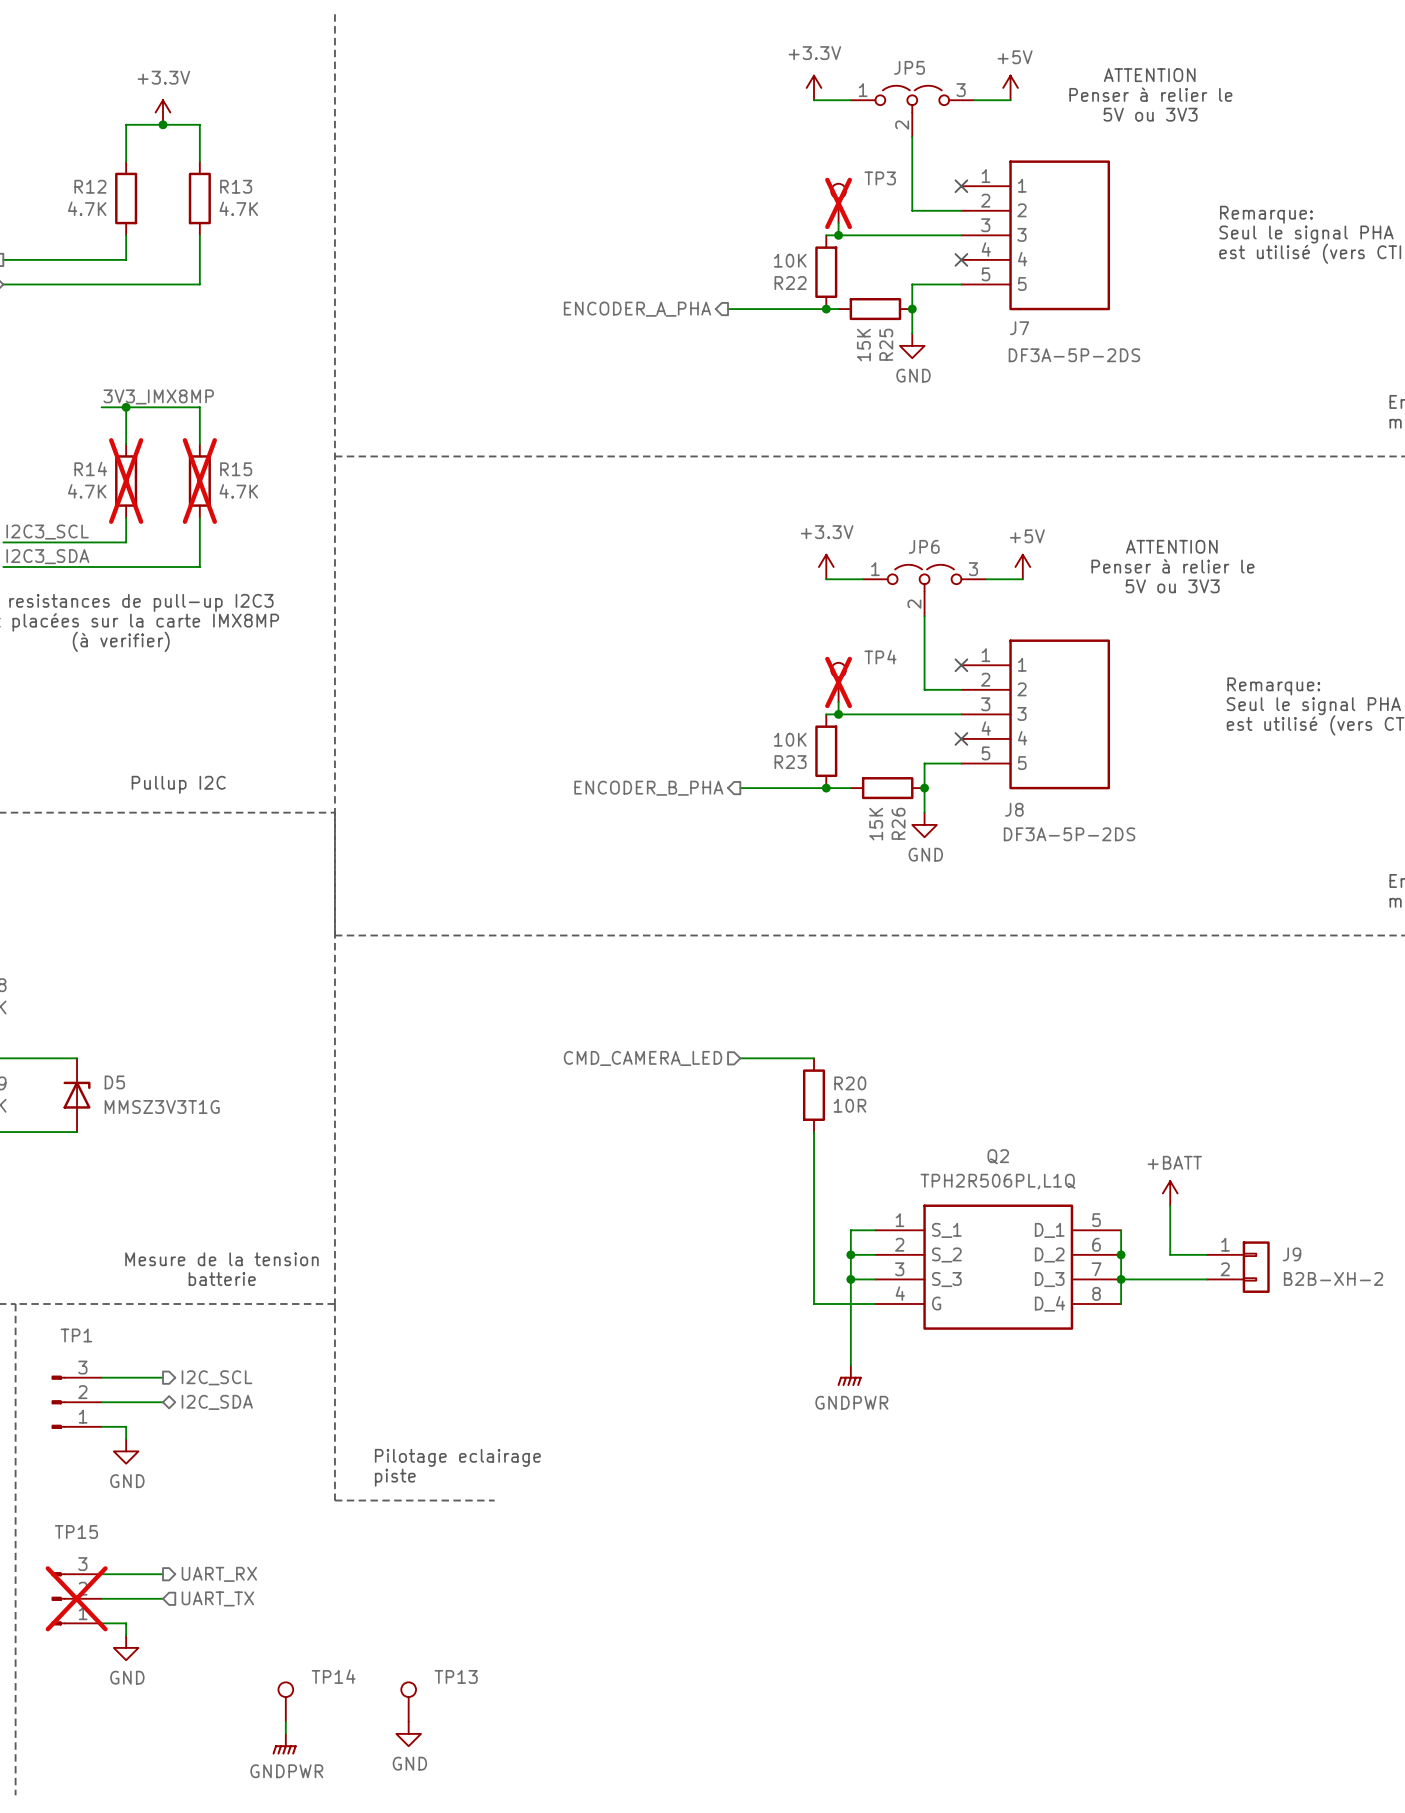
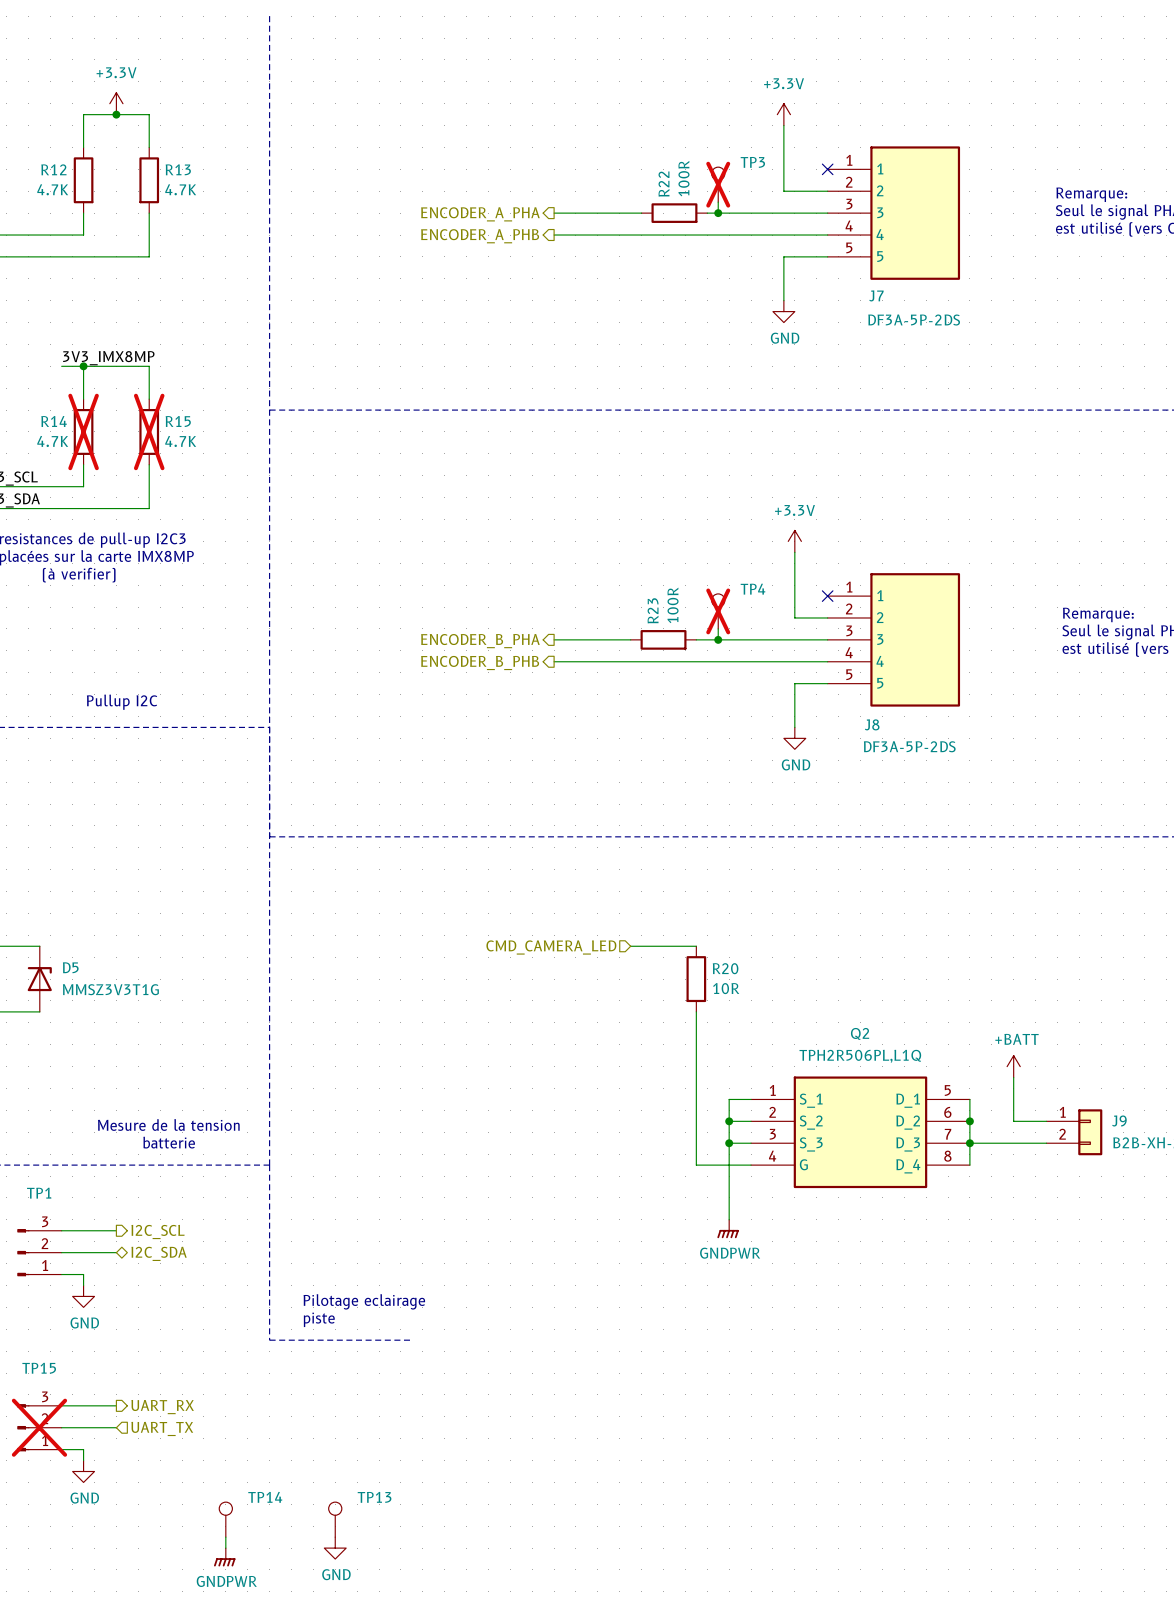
text: ATTENTION (1149, 75) -> none
power symbol position: +3.3V (814, 87) -> +3.3V (783, 114)
power symbol: +5V (1010, 87) -> none
text: Penser à relier le (1150, 94) -> none
wire: (814, 100) (850, 100) -> none
wire: (973, 100) (1010, 100) -> none
JP5: (912, 111) -> none
text: 5V ou 3V3 (1150, 114) -> none
wire: none -> (554, 213) (641, 213)
wire: none -> (554, 235) (827, 235)
no-connect mark: (961, 259) -> none
hierarchical label: none -> ENCODER_A_PHB (480, 236)
R22 value: 10K (790, 260) -> 100R (683, 178)
R22 rotation: 0° (826, 272) -> 90° clockwise (674, 213)
R22 position: (826, 272) -> (674, 213)
hierarchical label position: ENCODER_A_PHA (637, 309) -> ENCODER_A_PHA (480, 214)
wire: (728, 309) (838, 309) -> none
junction: (826, 309) -> none
R25: 15K (875, 309) -> none
junction: (912, 309) -> none
text: ATTENTION (1171, 546) -> none
text: Penser à relier le (1172, 566) -> none
power symbol position: +3.3V (826, 567) -> +3.3V (794, 541)
power symbol: +5V (1022, 567) -> none
wire: (826, 579) (863, 579) -> none
wire: (985, 579) (1022, 579) -> none
text: 5V ou 3V3 (1172, 586) -> none
JP6: (924, 590) -> none
wire: none -> (554, 639) (630, 639)
wire: none -> (696, 639) (707, 639)
wire: none -> (554, 661) (827, 661)
no-connect mark: (961, 738) -> none
hierarchical label: none -> ENCODER_B_PHB (480, 662)
R23 value: 10K (790, 739) -> 100R (673, 605)
R23 rotation: 0° (826, 751) -> 90° clockwise (663, 639)
R23 position: (826, 751) -> (663, 639)
hierarchical label position: ENCODER_B_PHA (648, 788) -> ENCODER_B_PHA (480, 641)
wire: (740, 788) (850, 788) -> none
junction: (826, 788) -> none
R26: 15K (887, 788) -> none
junction: (924, 788) -> none

